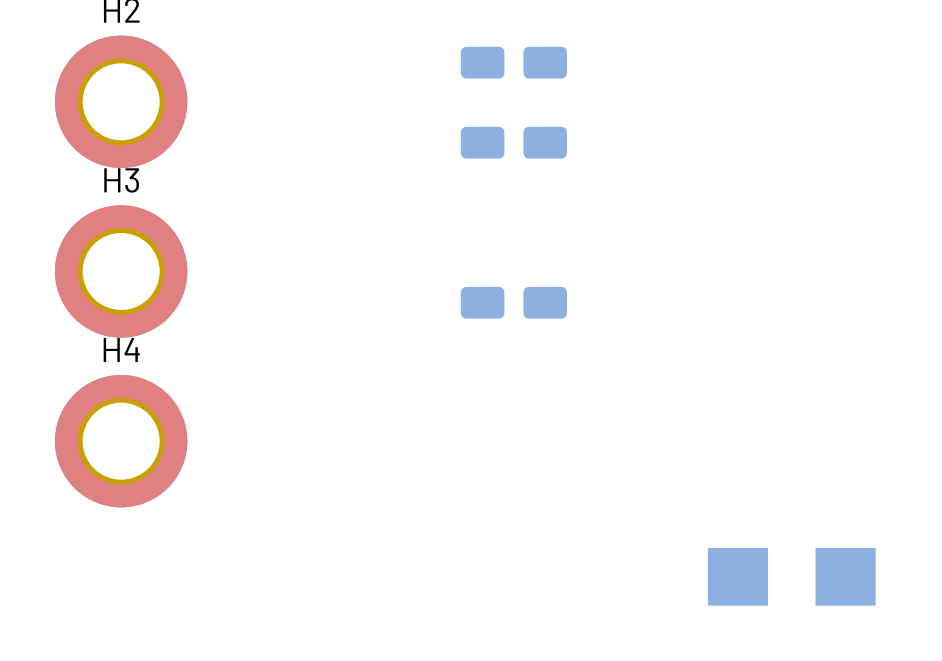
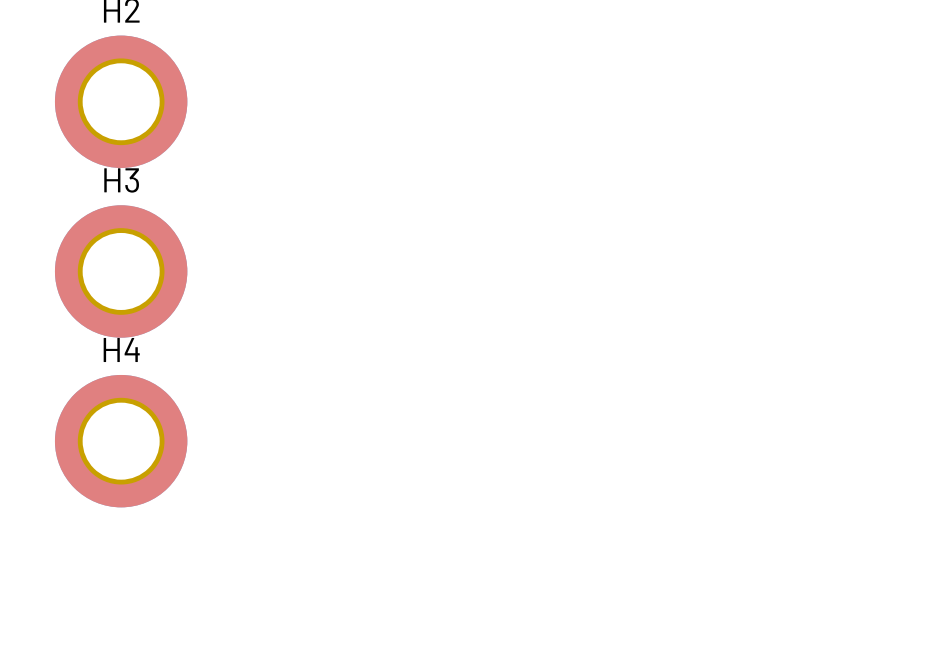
part: (513, 62) -> none
part: (513, 142) -> none
part: (513, 302) -> none
part: (791, 576) -> none

